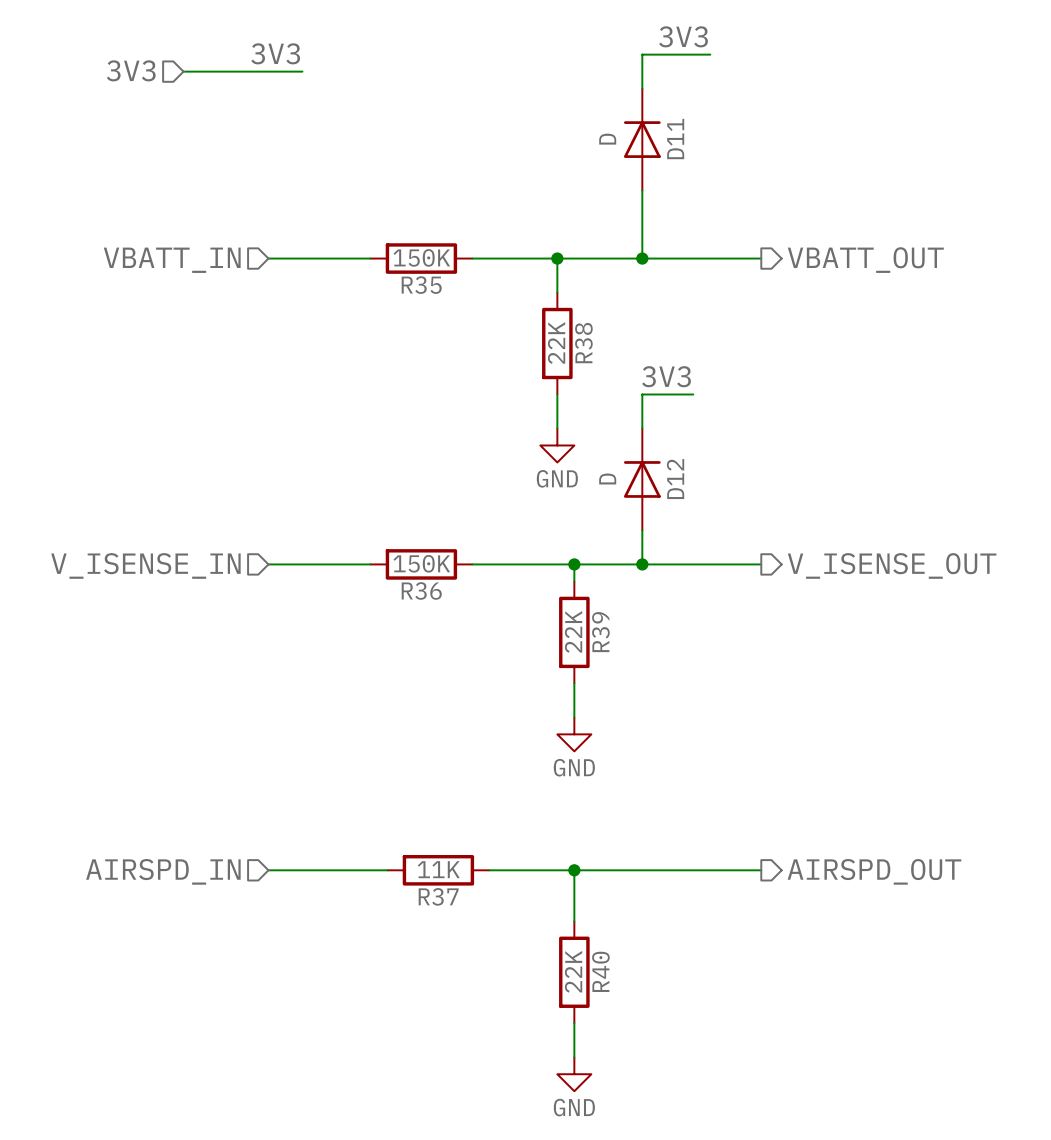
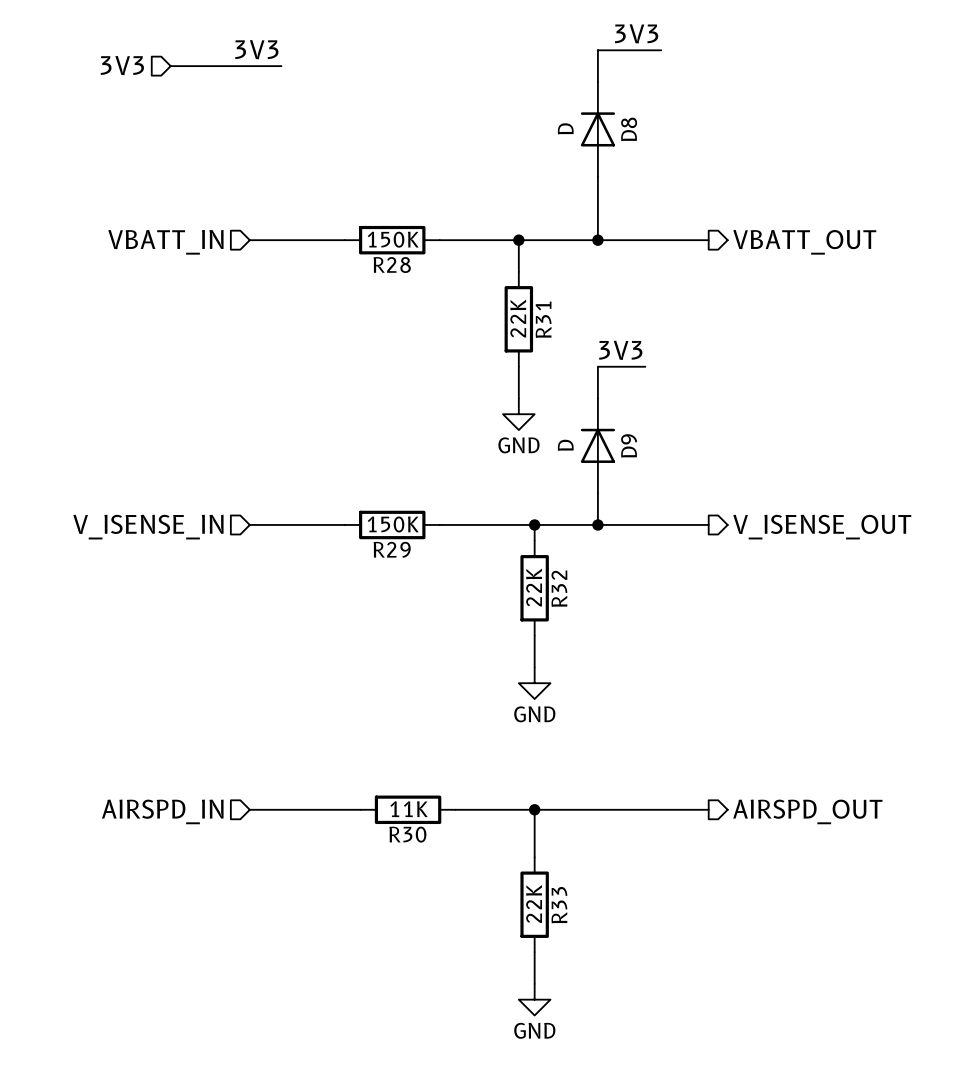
D11 name: D11 (675, 139) -> D8 (629, 129)
R35 name: R35 (421, 285) -> R28 (392, 265)
R38 name: R38 (583, 343) -> R31 (543, 319)
D12 name: D12 (675, 479) -> D9 (629, 445)
R36 name: R36 (421, 590) -> R29 (392, 549)
R39 name: R39 (600, 632) -> R32 (559, 588)
R37 name: R37 (438, 896) -> R30 (407, 834)
R40 name: R40 (600, 971) -> R33 (559, 905)

